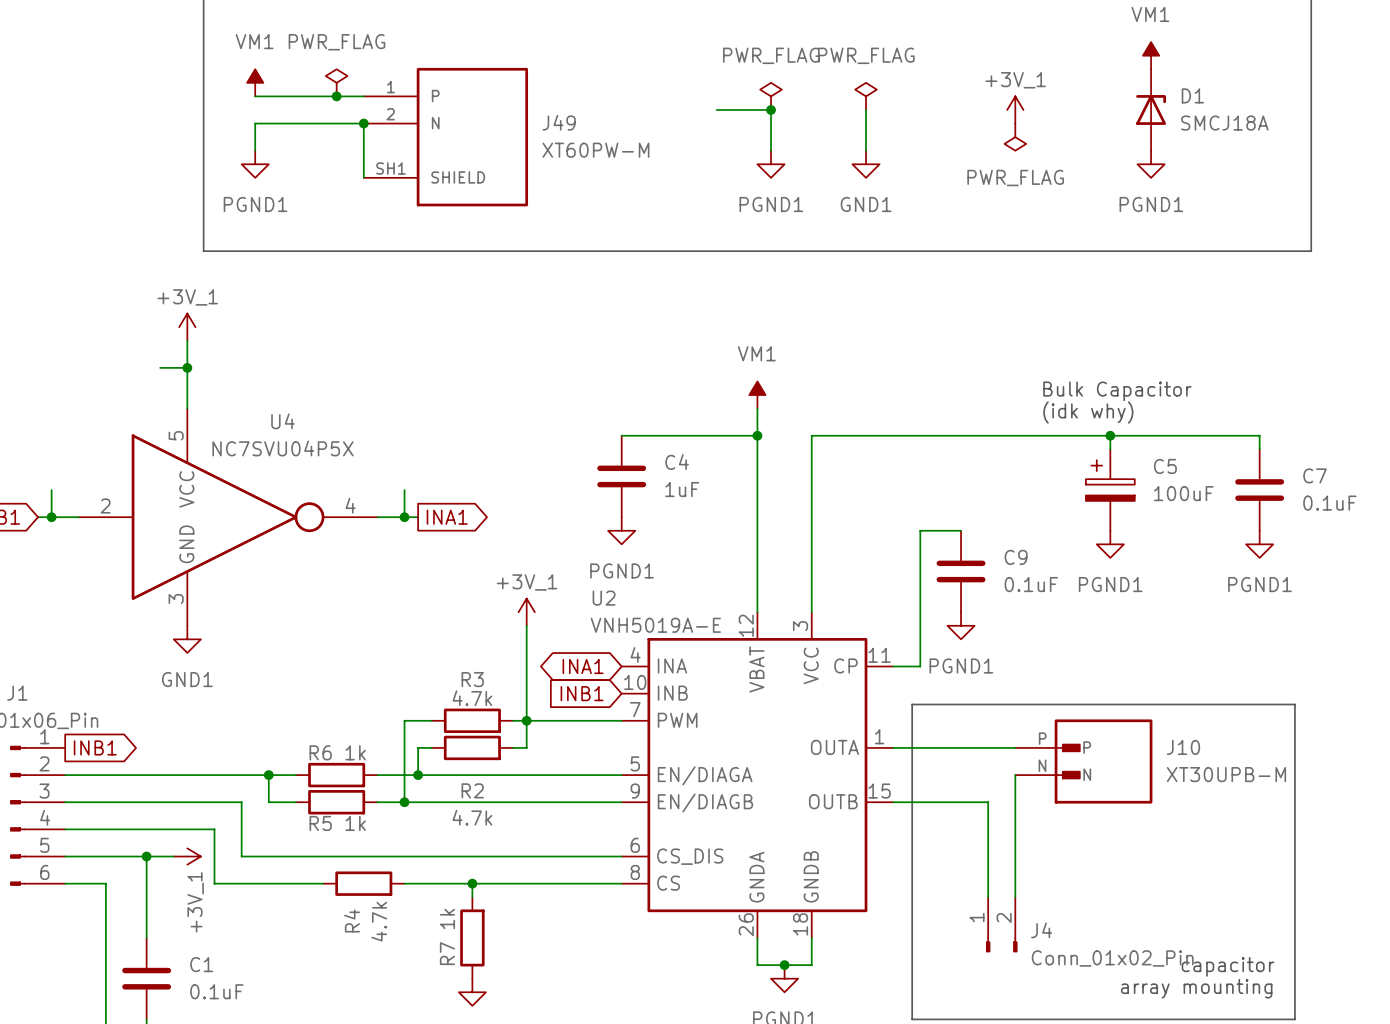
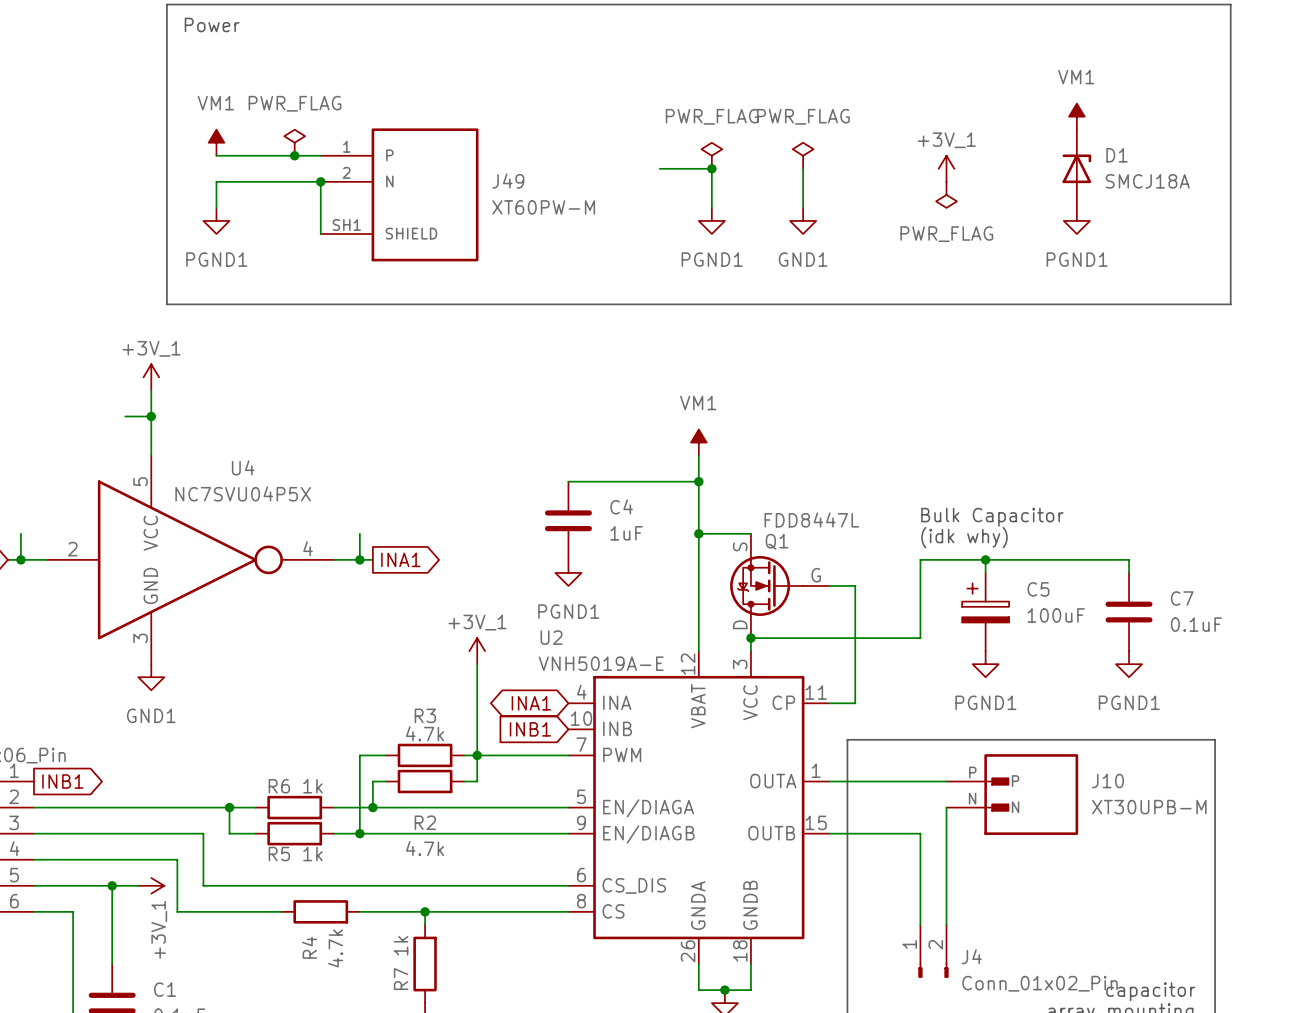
text position: Bulk Capacitor (1117, 391) -> Bulk Capacitor (992, 517)
text position: (idk why) (1088, 412) -> (idk why) (964, 537)
wire: (1110, 435) (1110, 449) -> (985, 559) (985, 572)
junction: (1110, 435) -> none
wire: (1259, 449) (1259, 435) (811, 435) (811, 598) -> (1129, 572) (1129, 559) (920, 559) (920, 638) (750, 638)
wire: none -> (698, 533) (750, 533)
junction: none -> (698, 533)
C5 position: (1110, 490) -> (985, 612)
C7 position: (1259, 490) -> (1129, 612)
junction: none -> (985, 559)
wire: (961, 530) (920, 530) (920, 544) -> (829, 585) (855, 585)
Q1: none -> FDD8447L (779, 585)
power symbol: PGND1 (1110, 544) -> none
power symbol: PGND1 (1259, 544) -> none
C9: 0.1uF (961, 571) -> none
junction: none -> (750, 638)
power symbol: PGND1 (961, 625) -> none
power symbol: none -> PGND1 (985, 664)
power symbol: none -> PGND1 (1129, 664)

